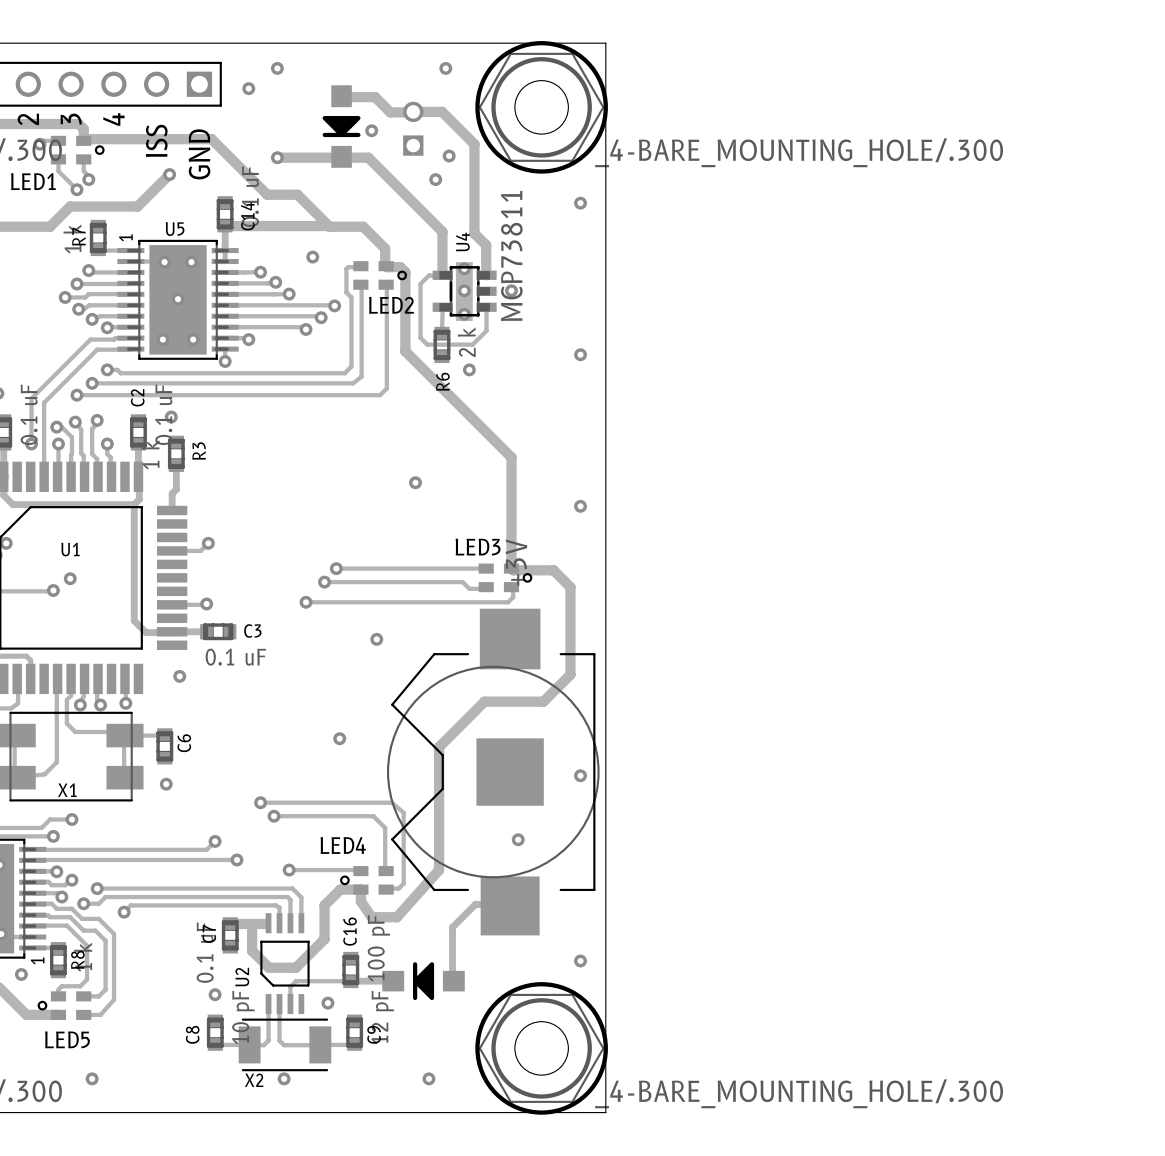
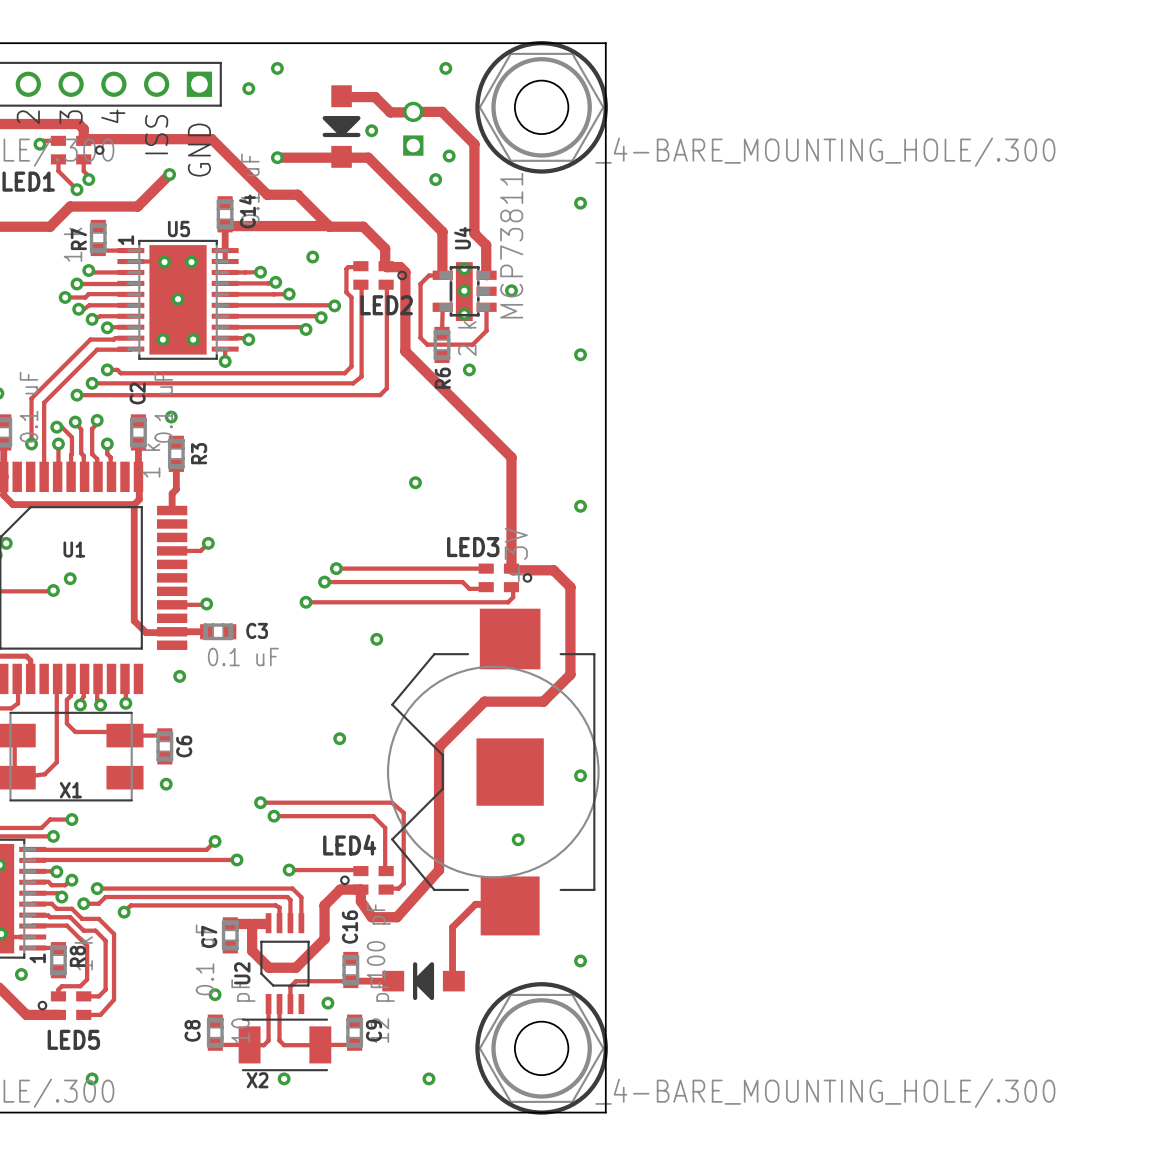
track: (124, 735) (124, 779) -> none

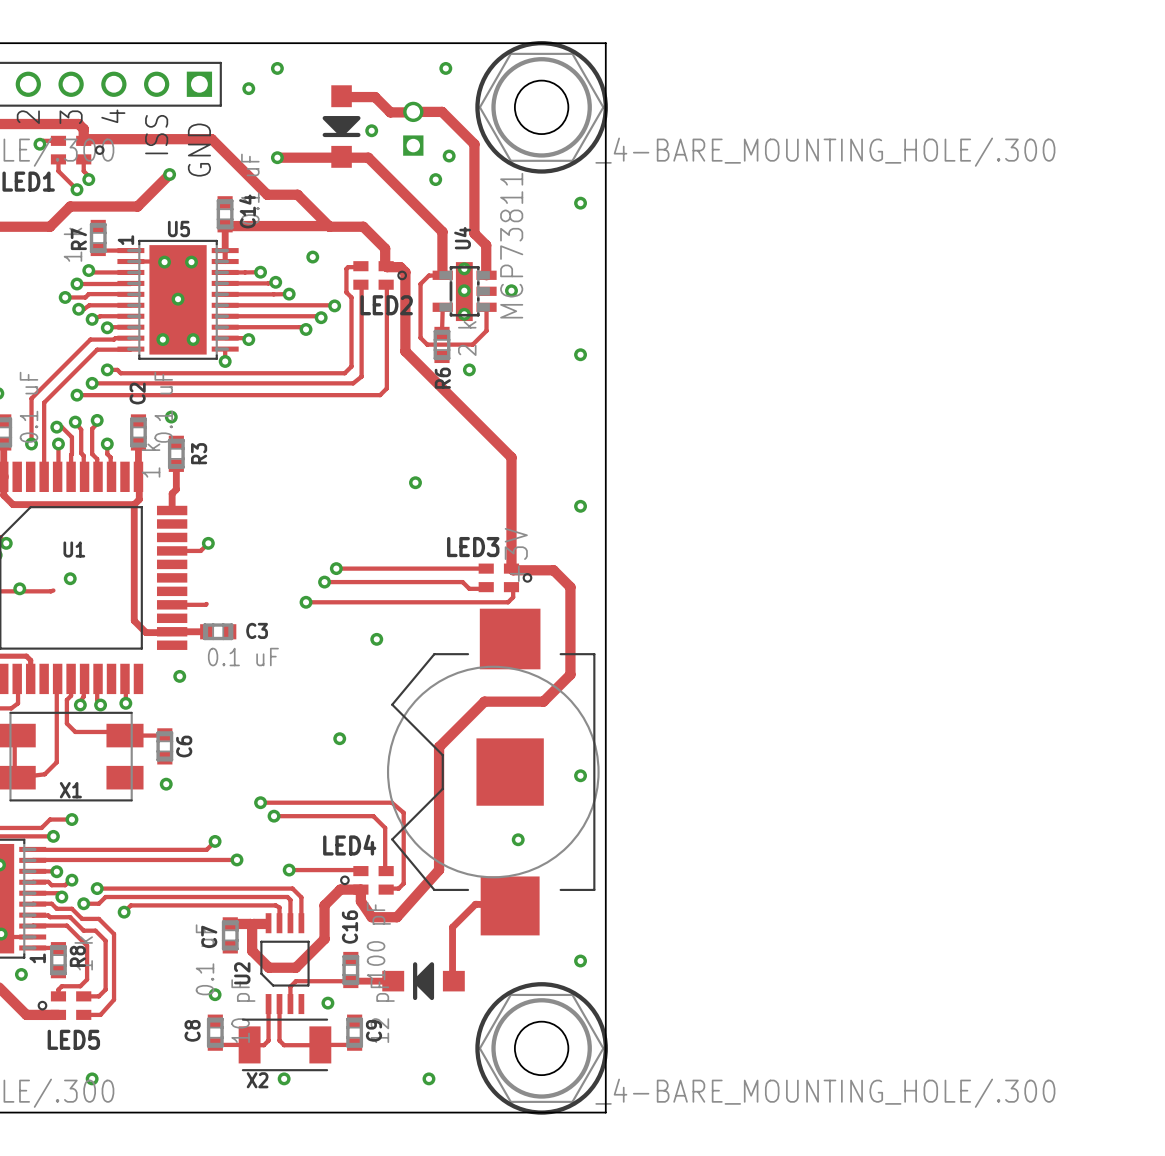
via position: (53, 590) -> (19, 588)
via: (206, 603) -> none

